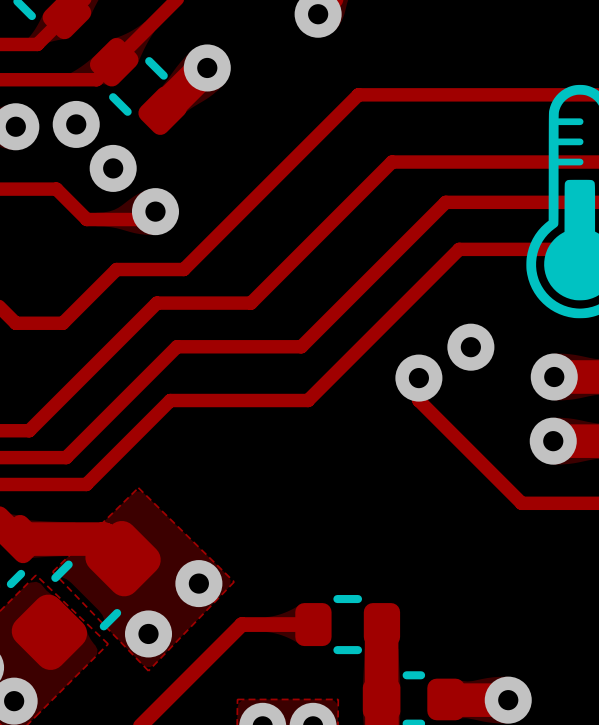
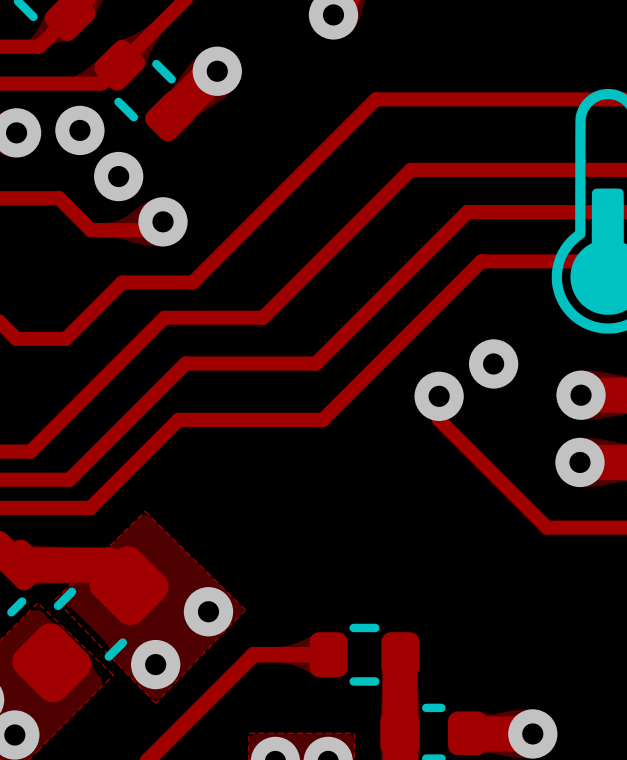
line: (553, 121) (580, 121) -> none
line: (553, 141) (580, 141) -> none
line: (553, 162) (580, 162) -> none

